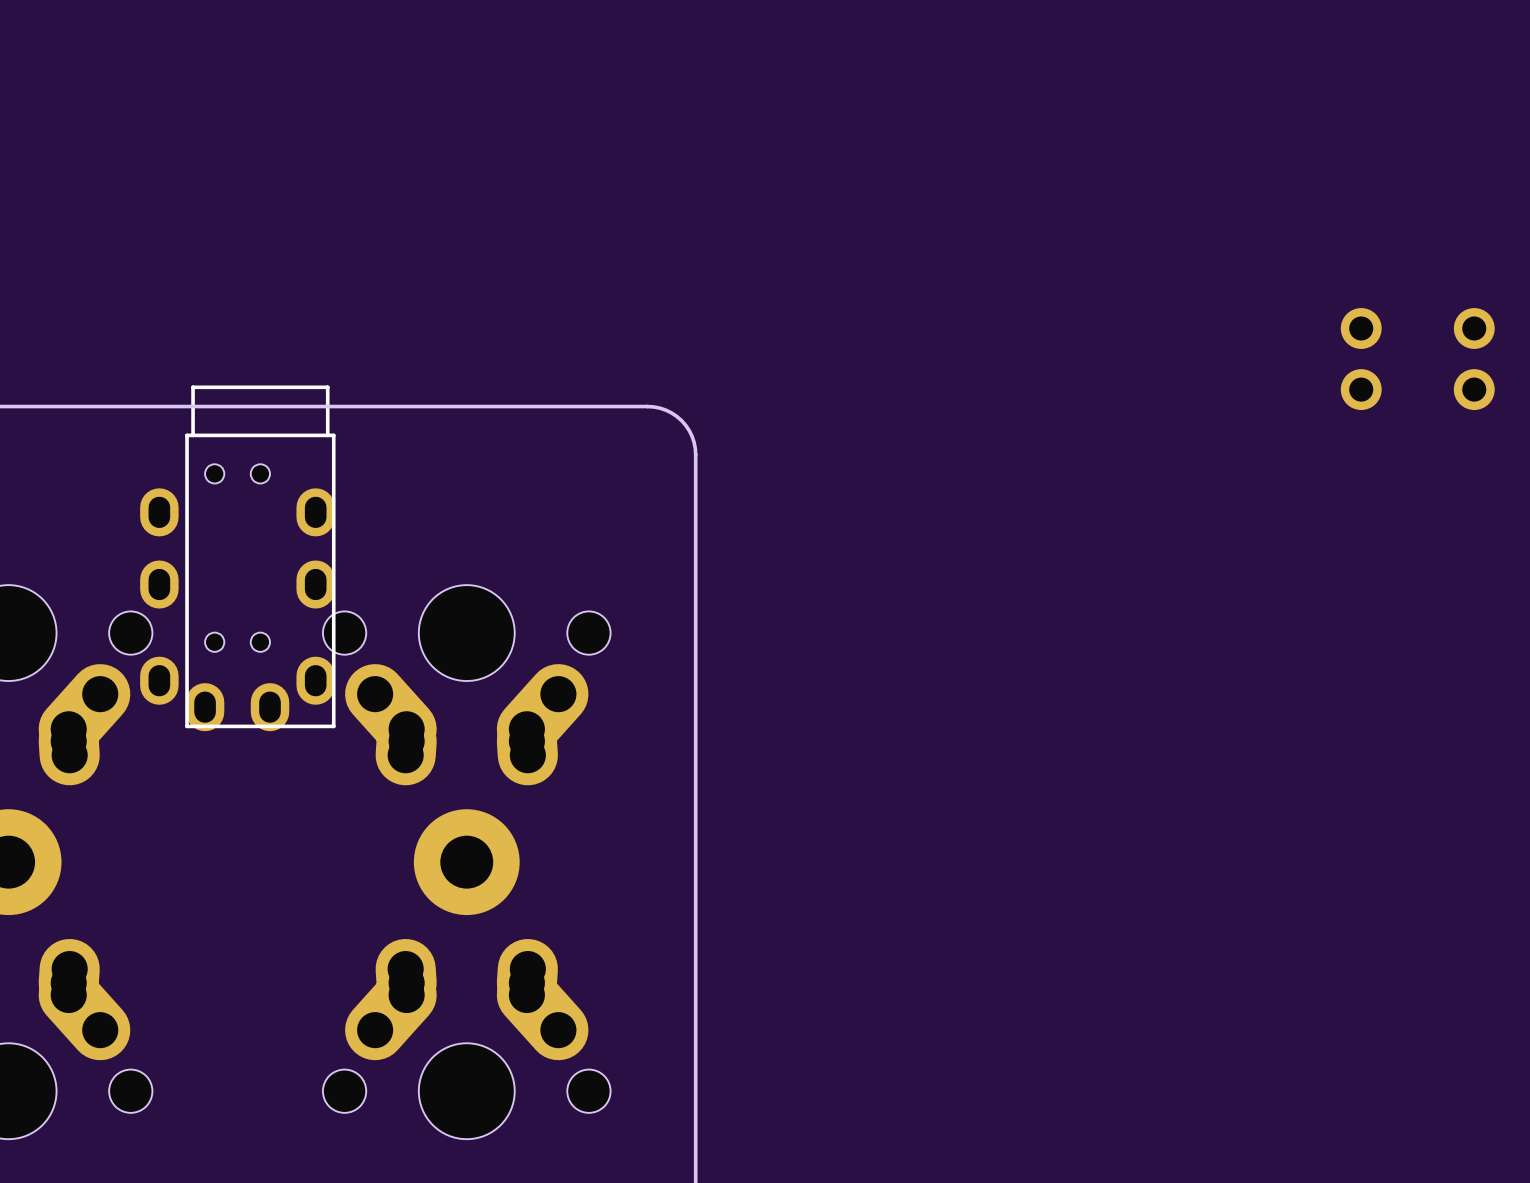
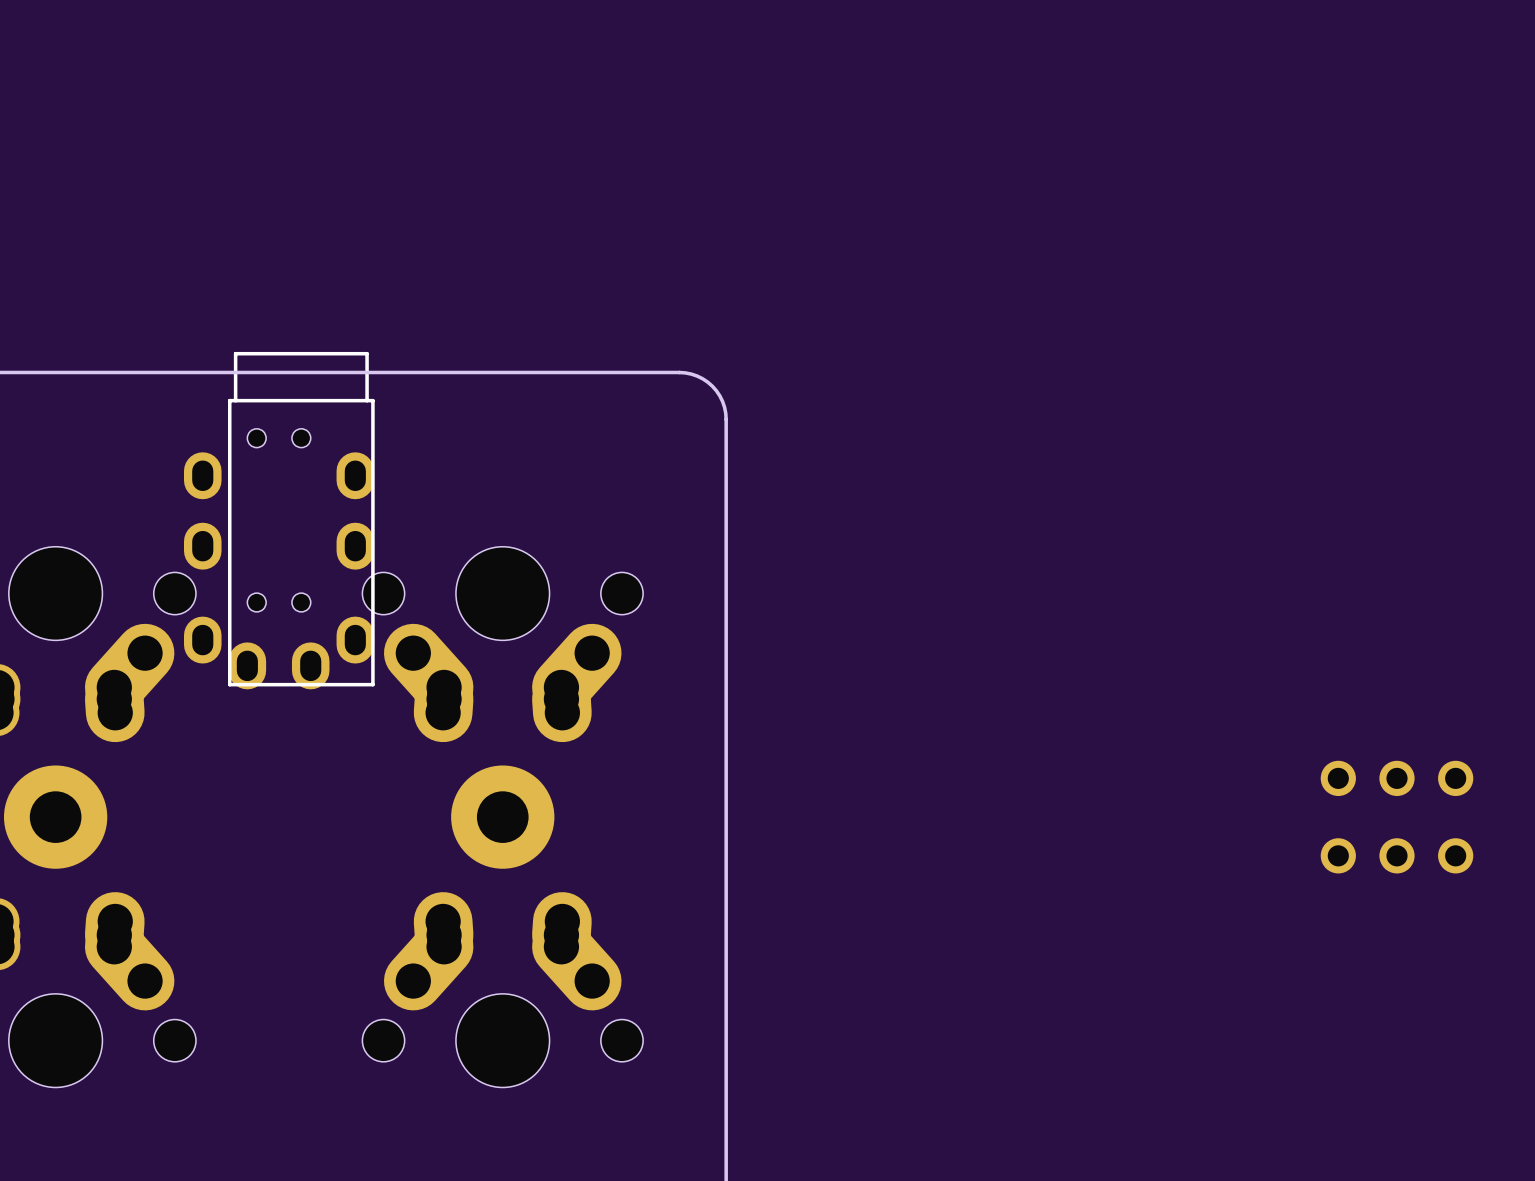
part: (1361, 359) -> none
part: (1474, 359) -> none
part: none -> (1396, 817)

